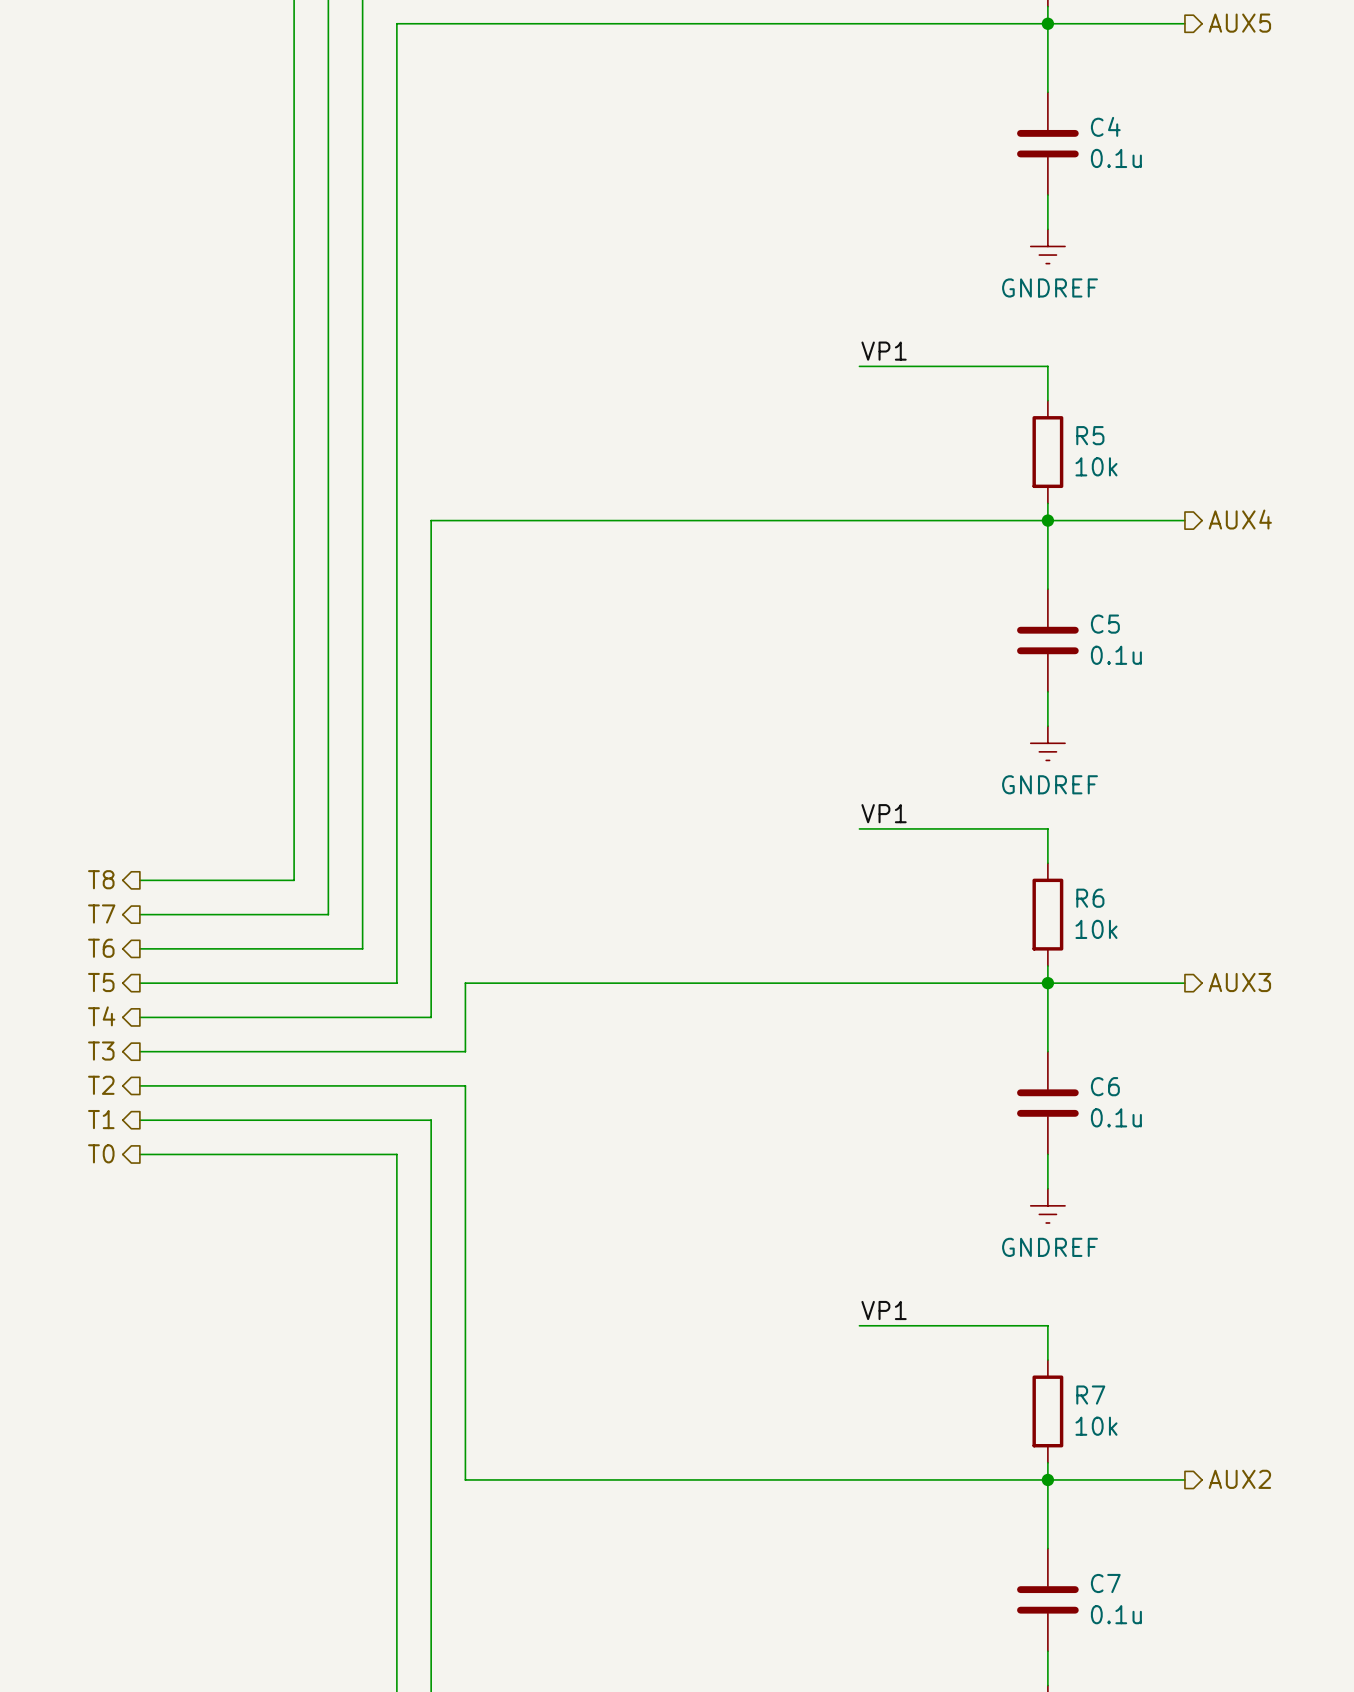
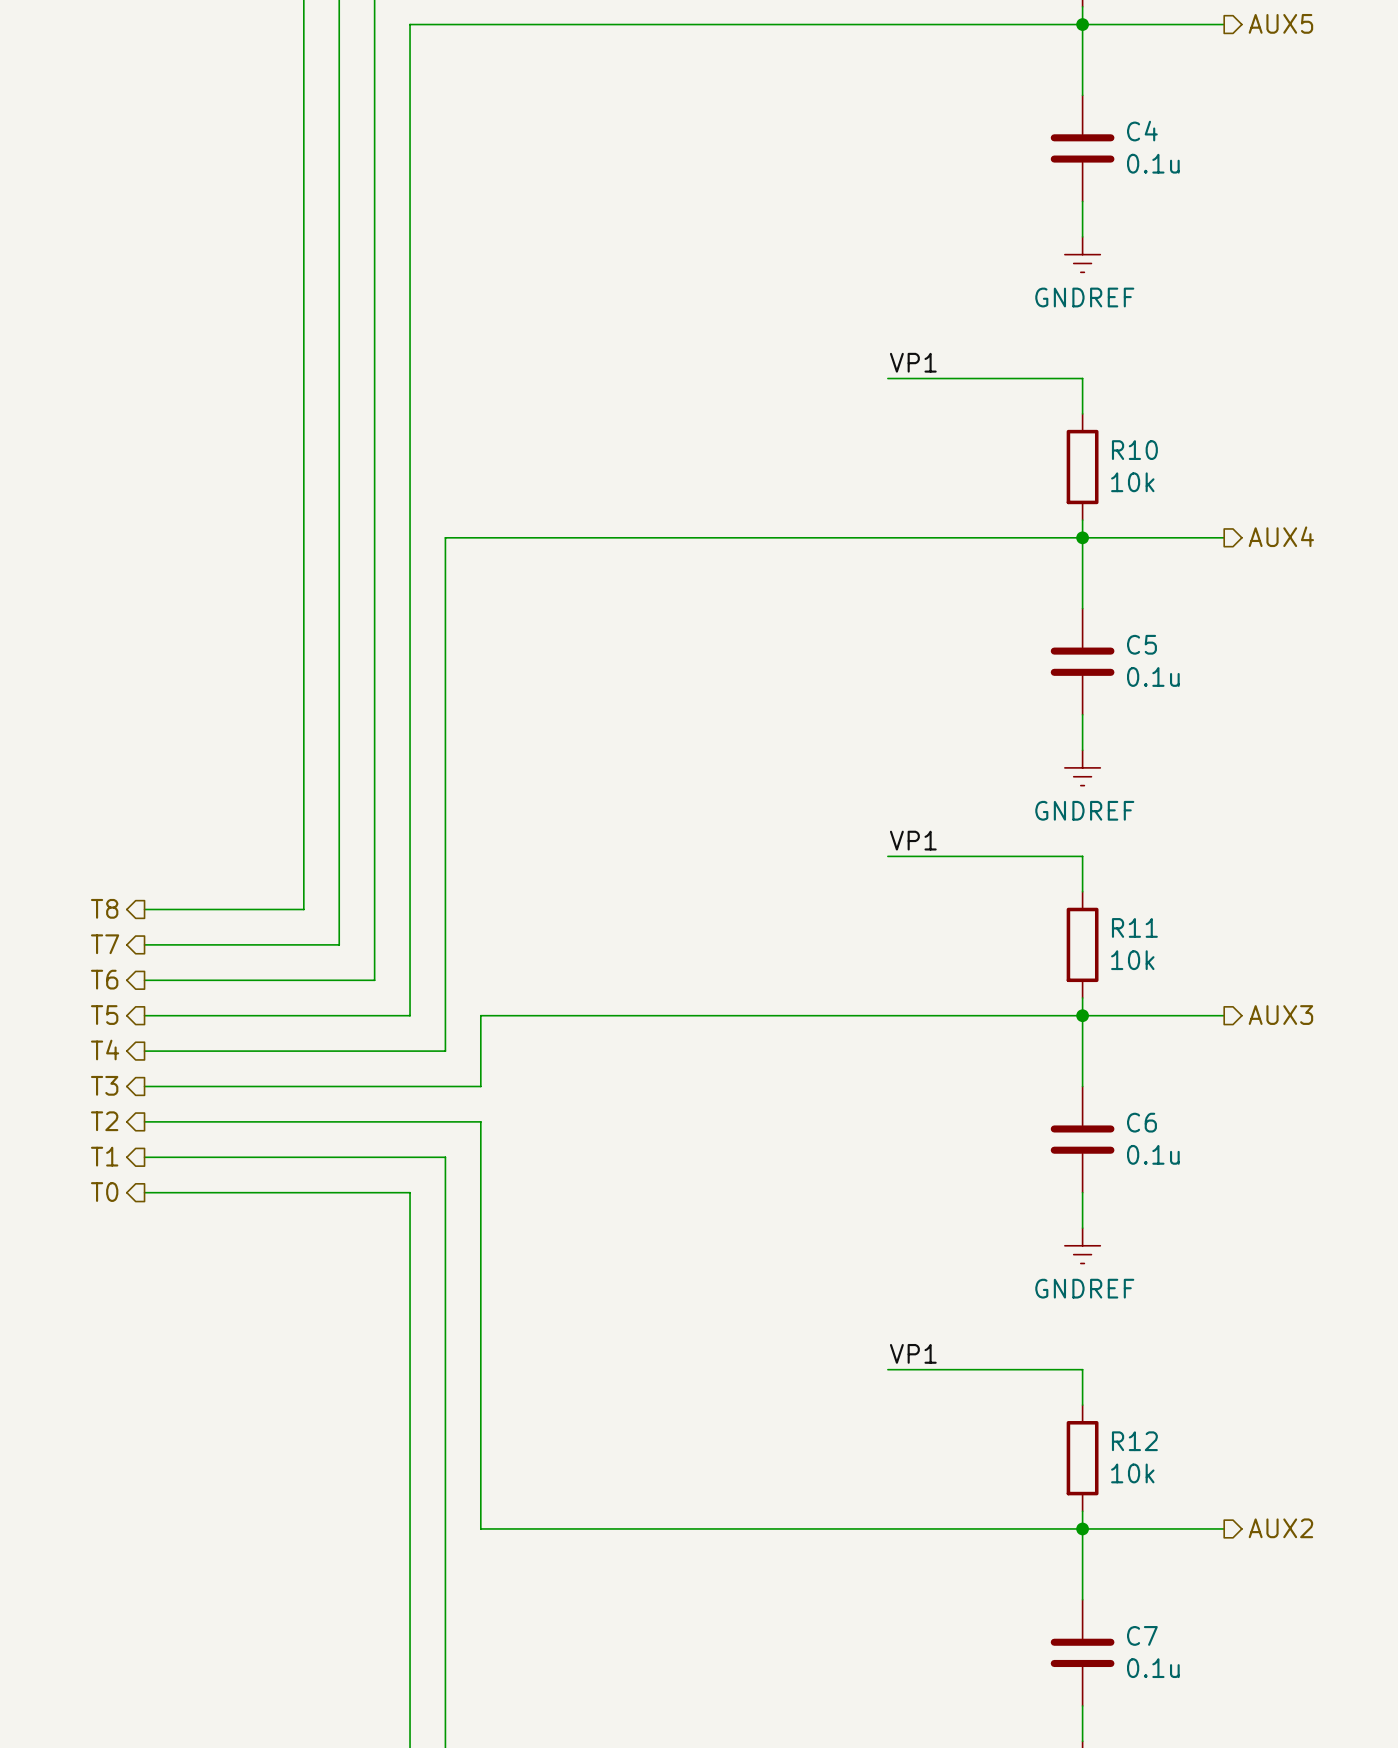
R5 name: R5 (1090, 435) -> R10 (1134, 450)
R6 name: R6 (1090, 898) -> R11 (1134, 927)
R7 name: R7 (1090, 1395) -> R12 (1134, 1441)

